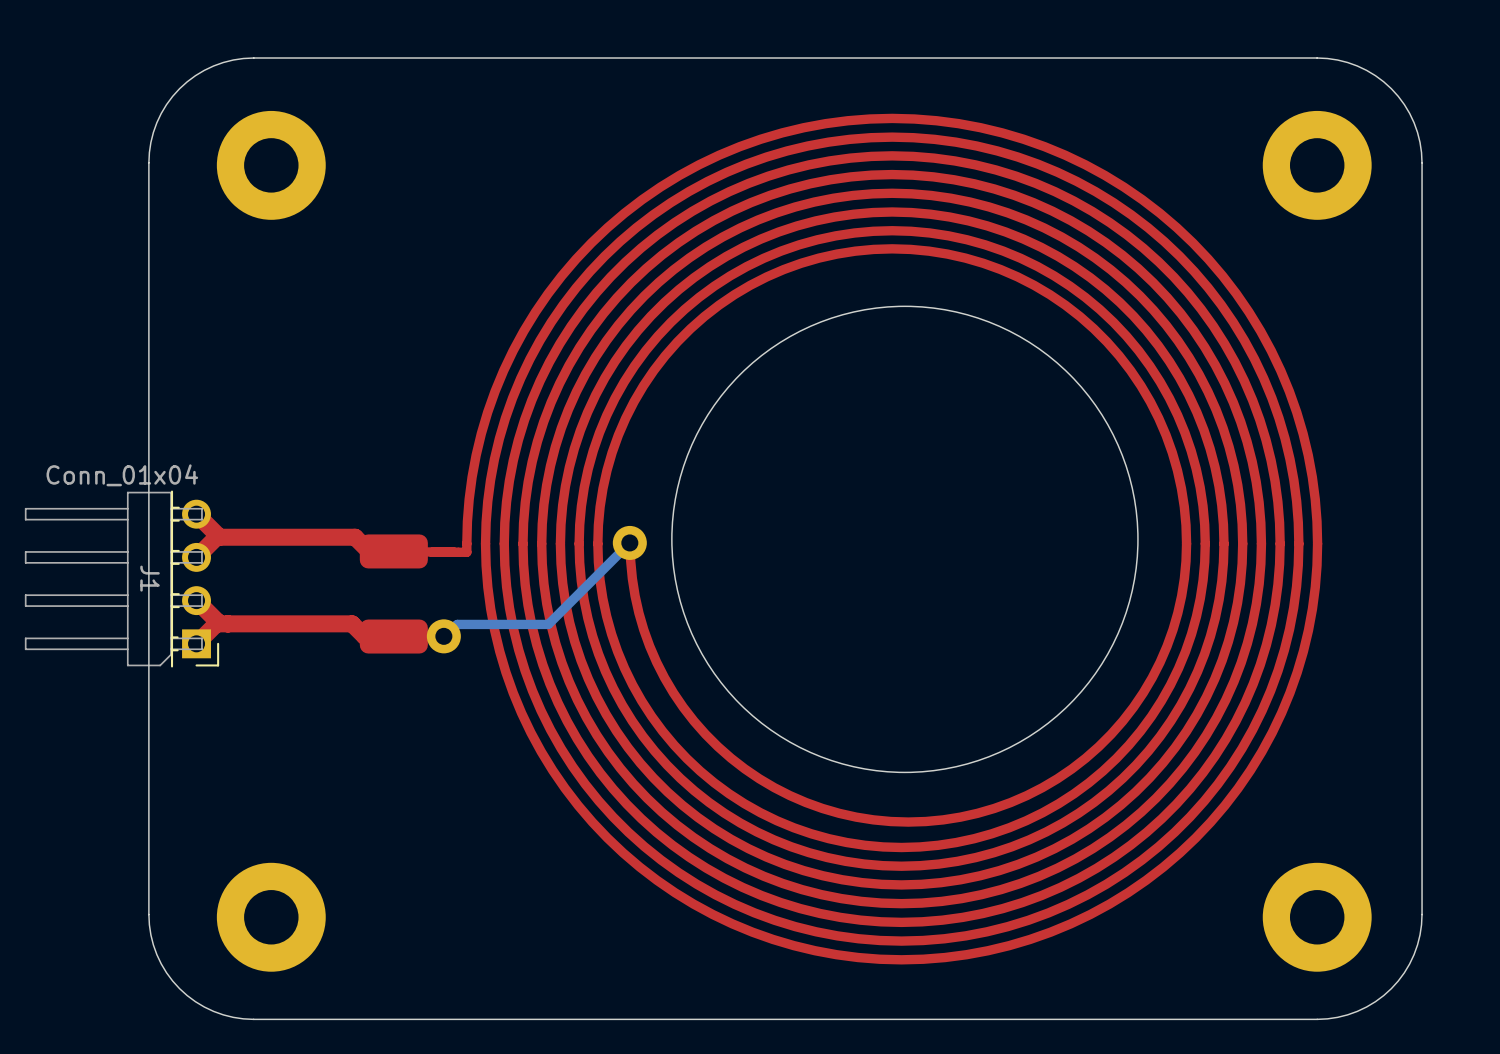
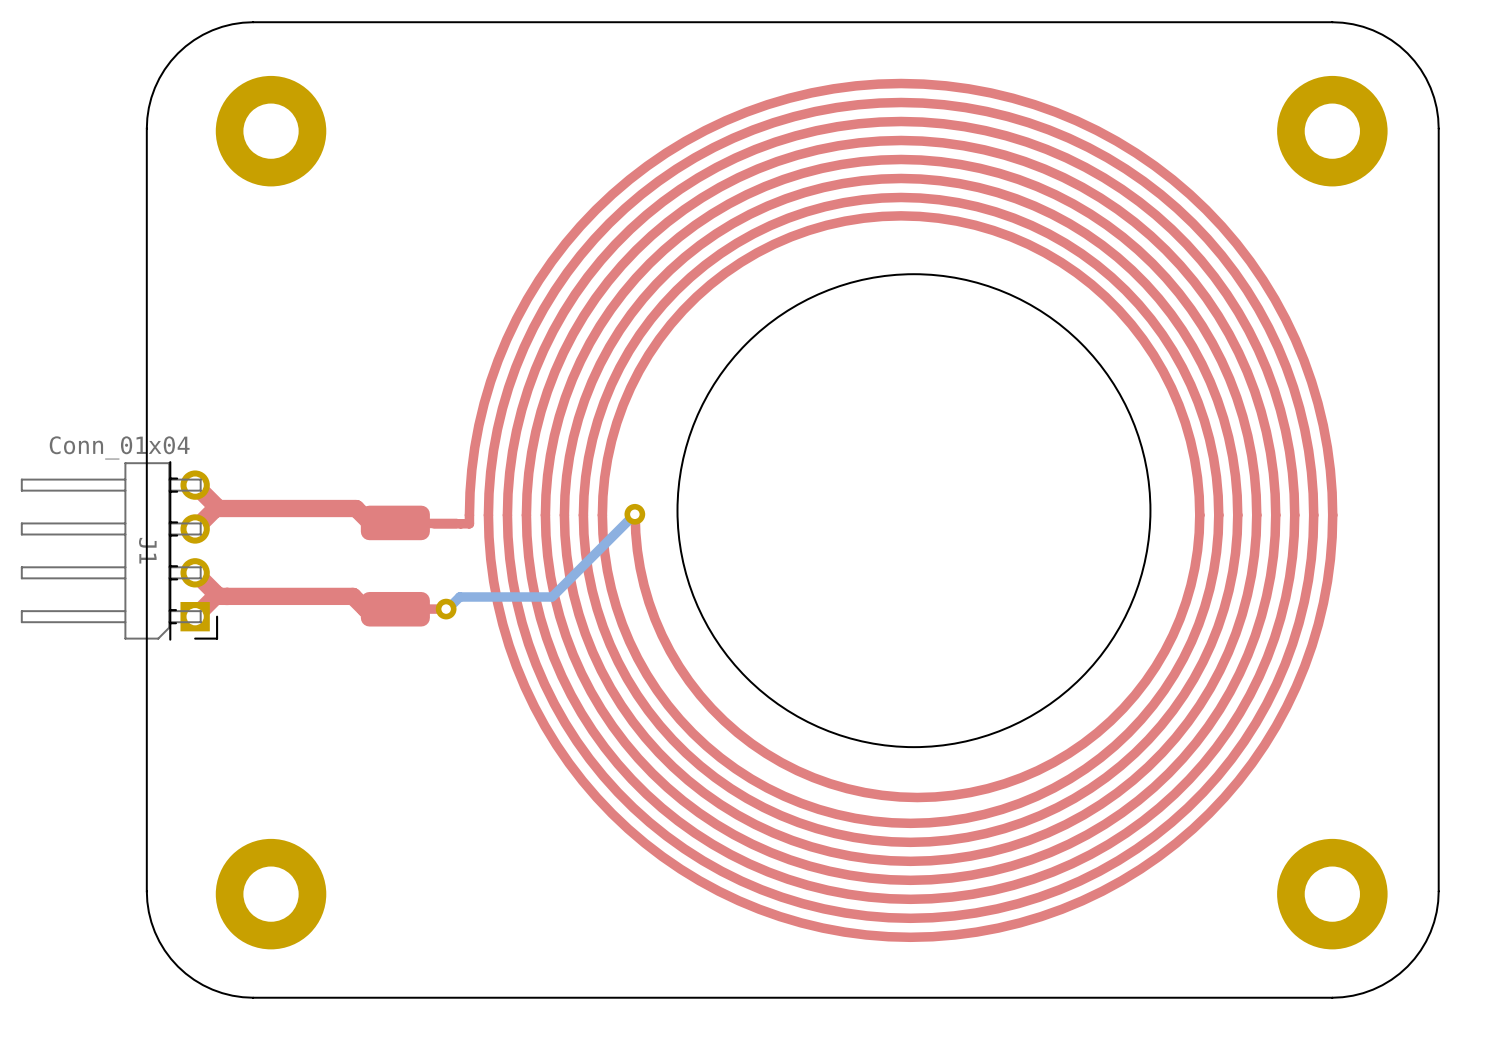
part footprint: [359, 113, 1323, 965] -> [360, 78, 1338, 943]

